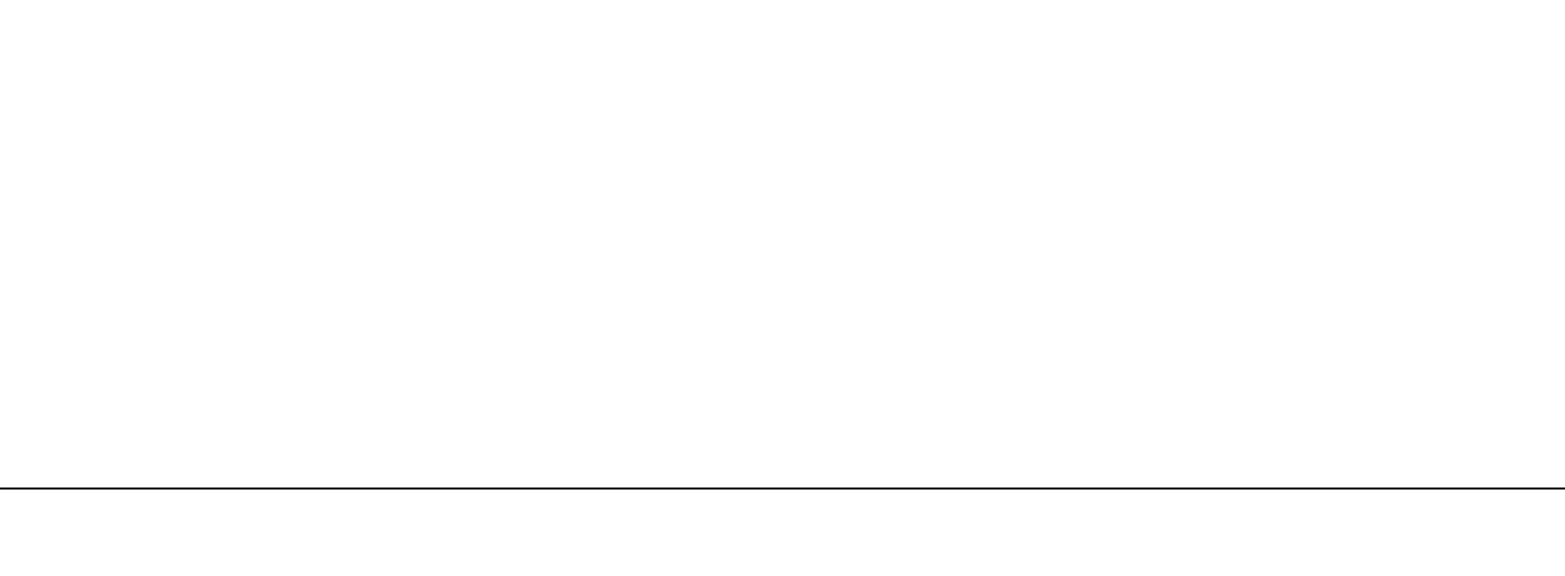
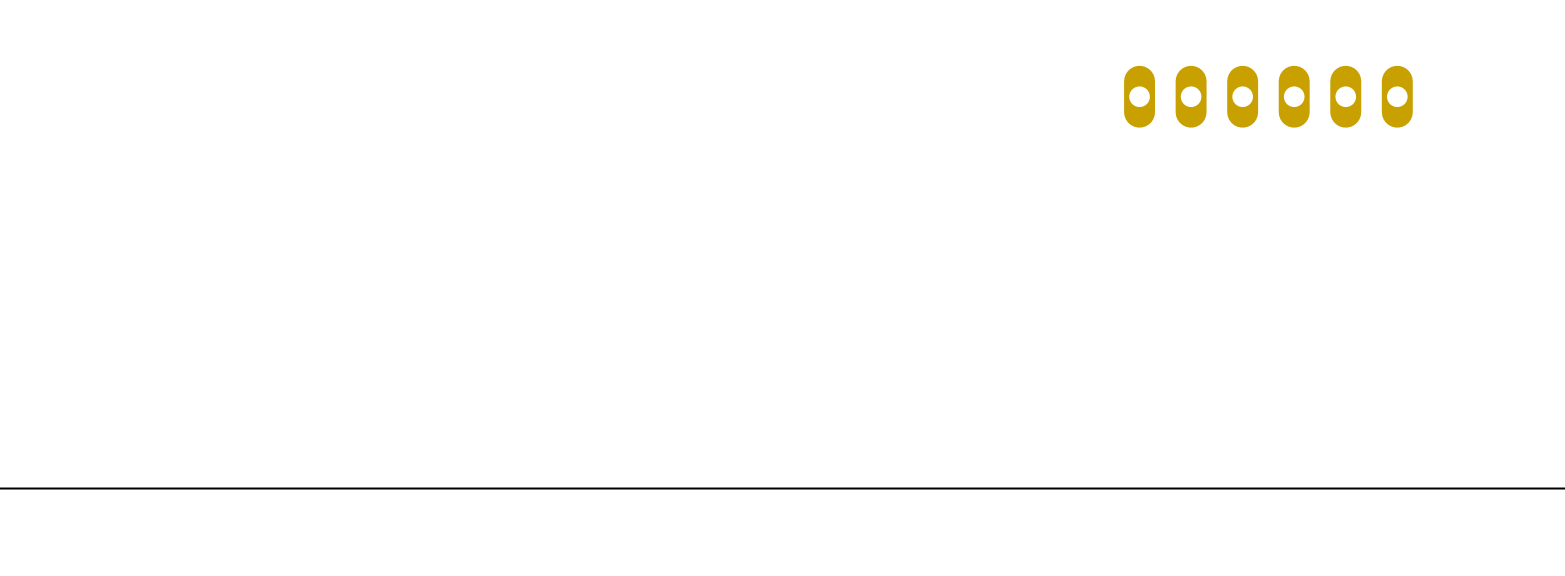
part: none -> (1268, 96)

